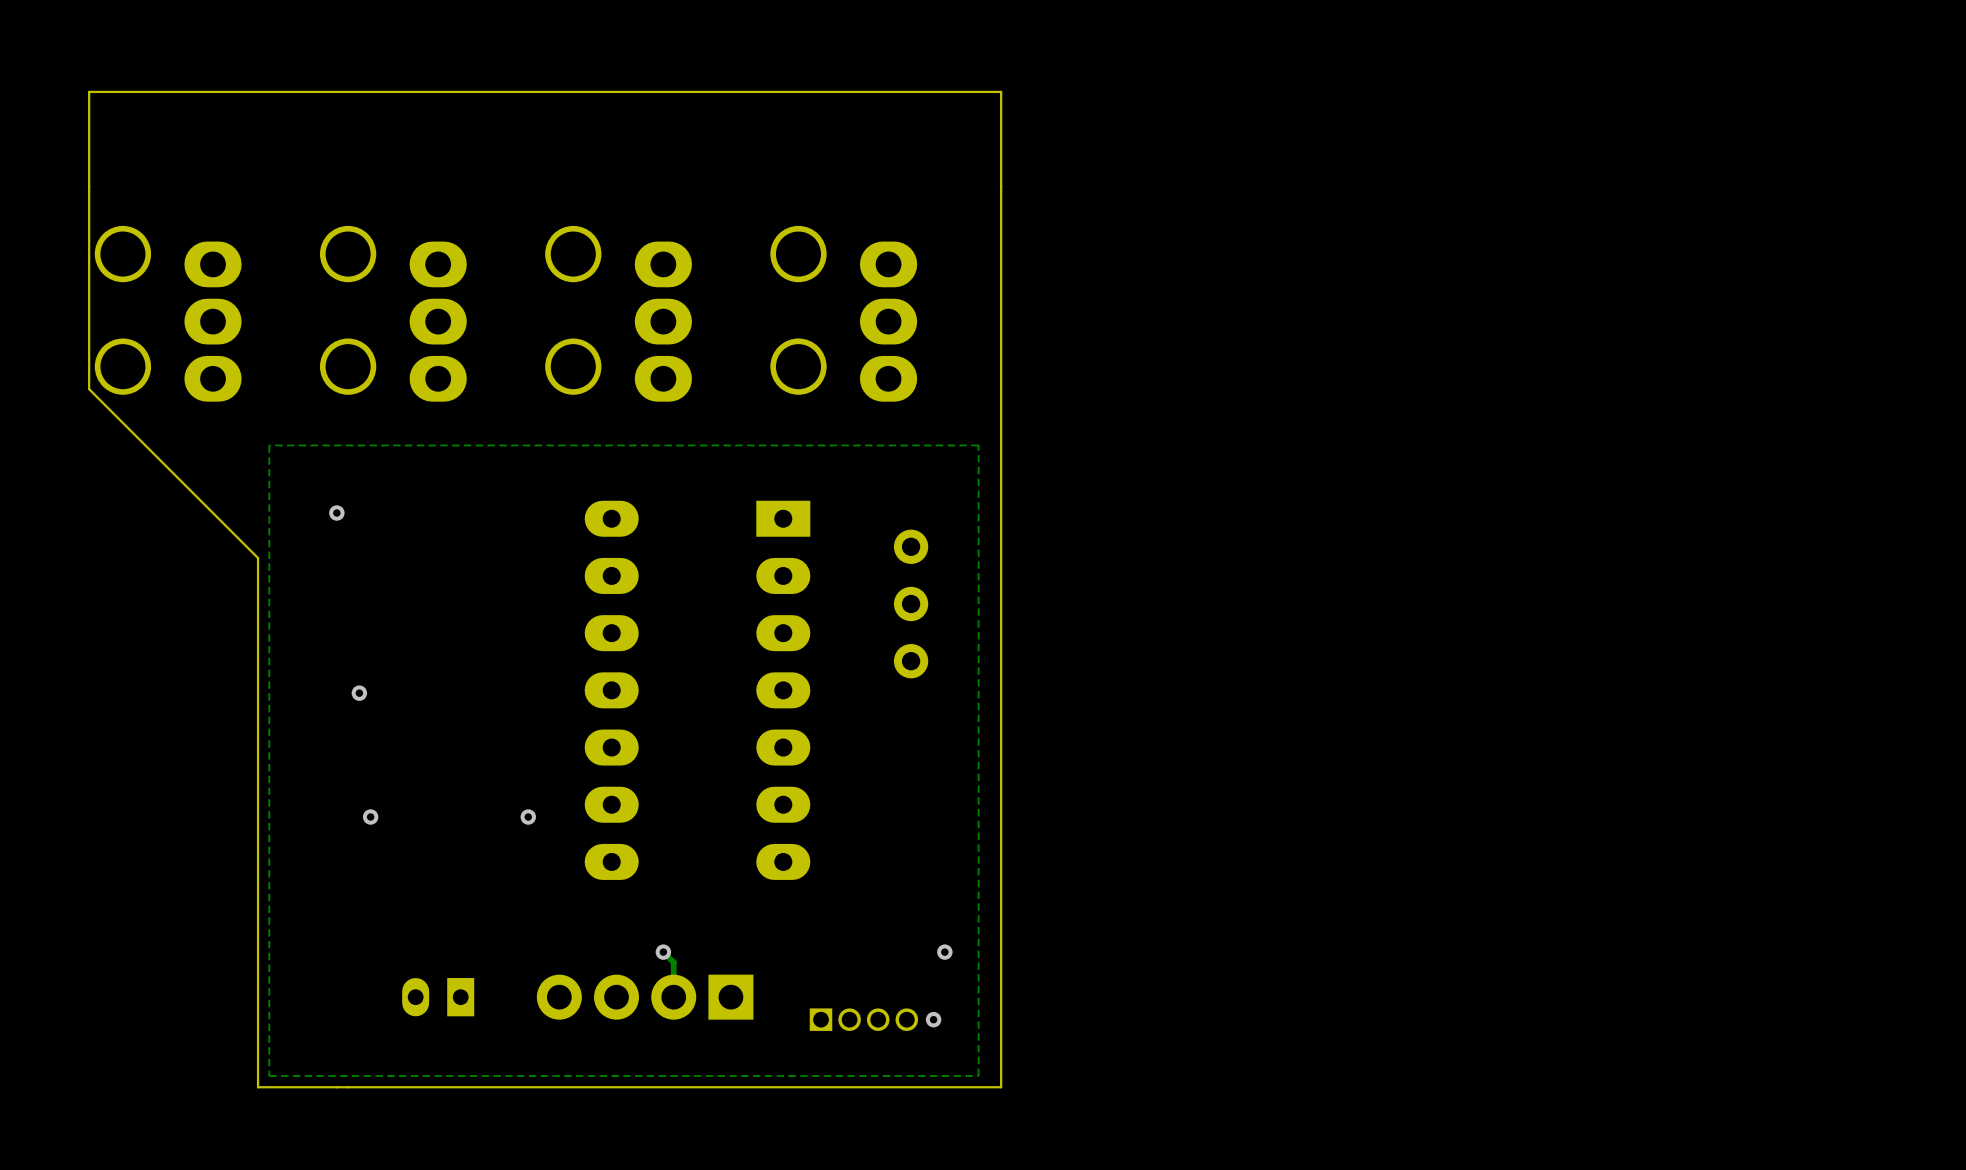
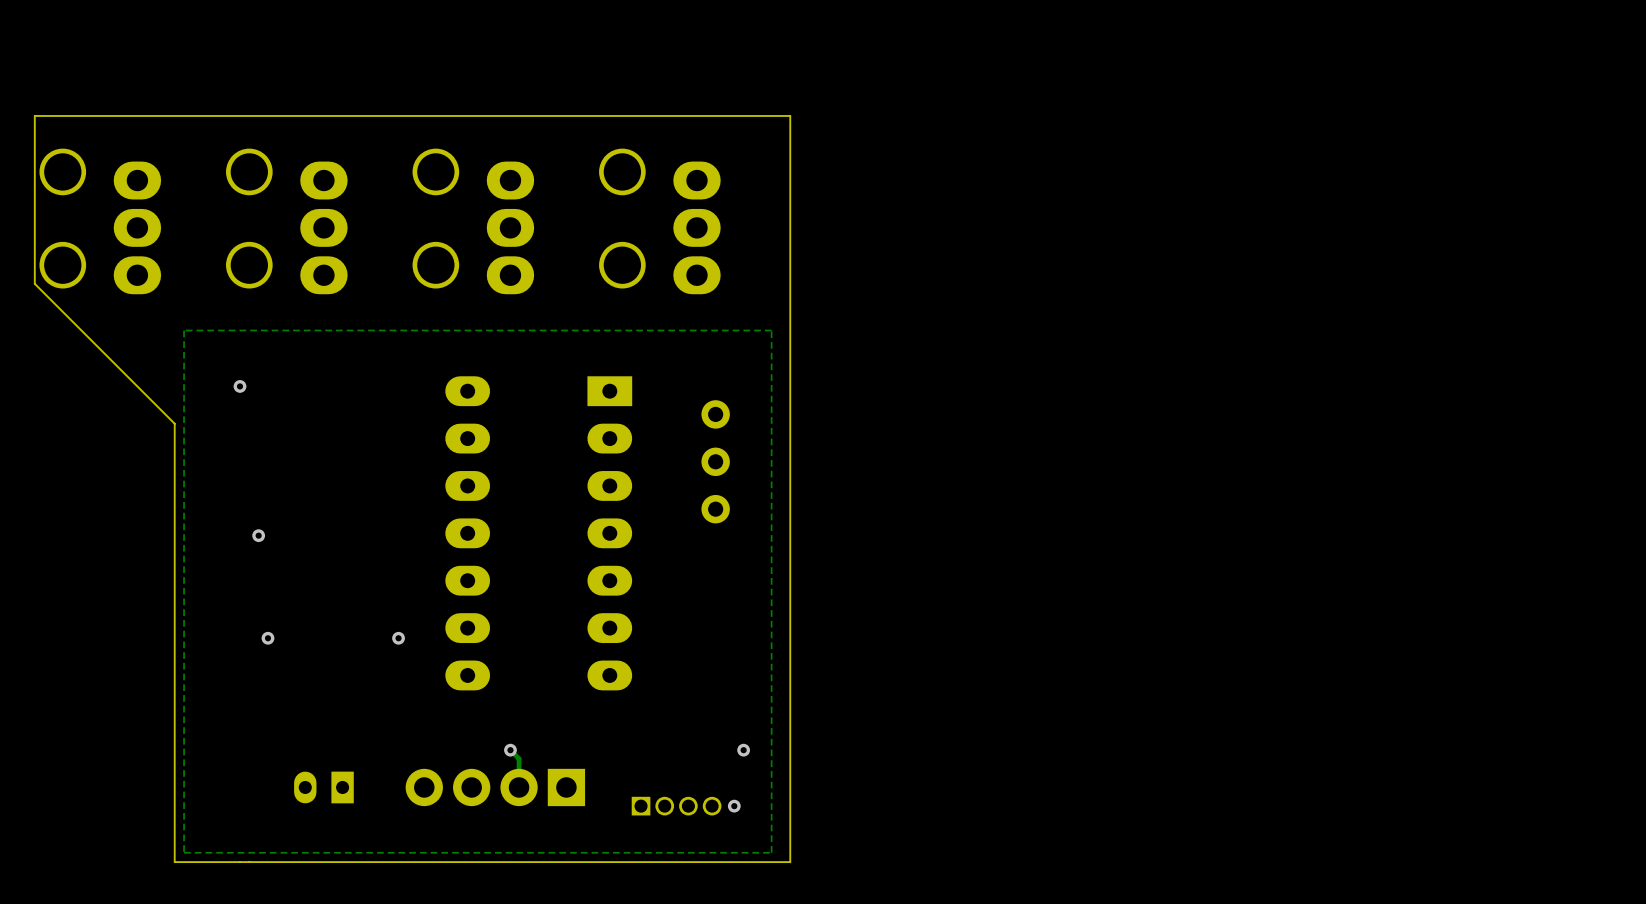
board edge: (1001, 186) (1001, 91) (89, 91) (89, 186) -> (790, 115) (34, 115)

